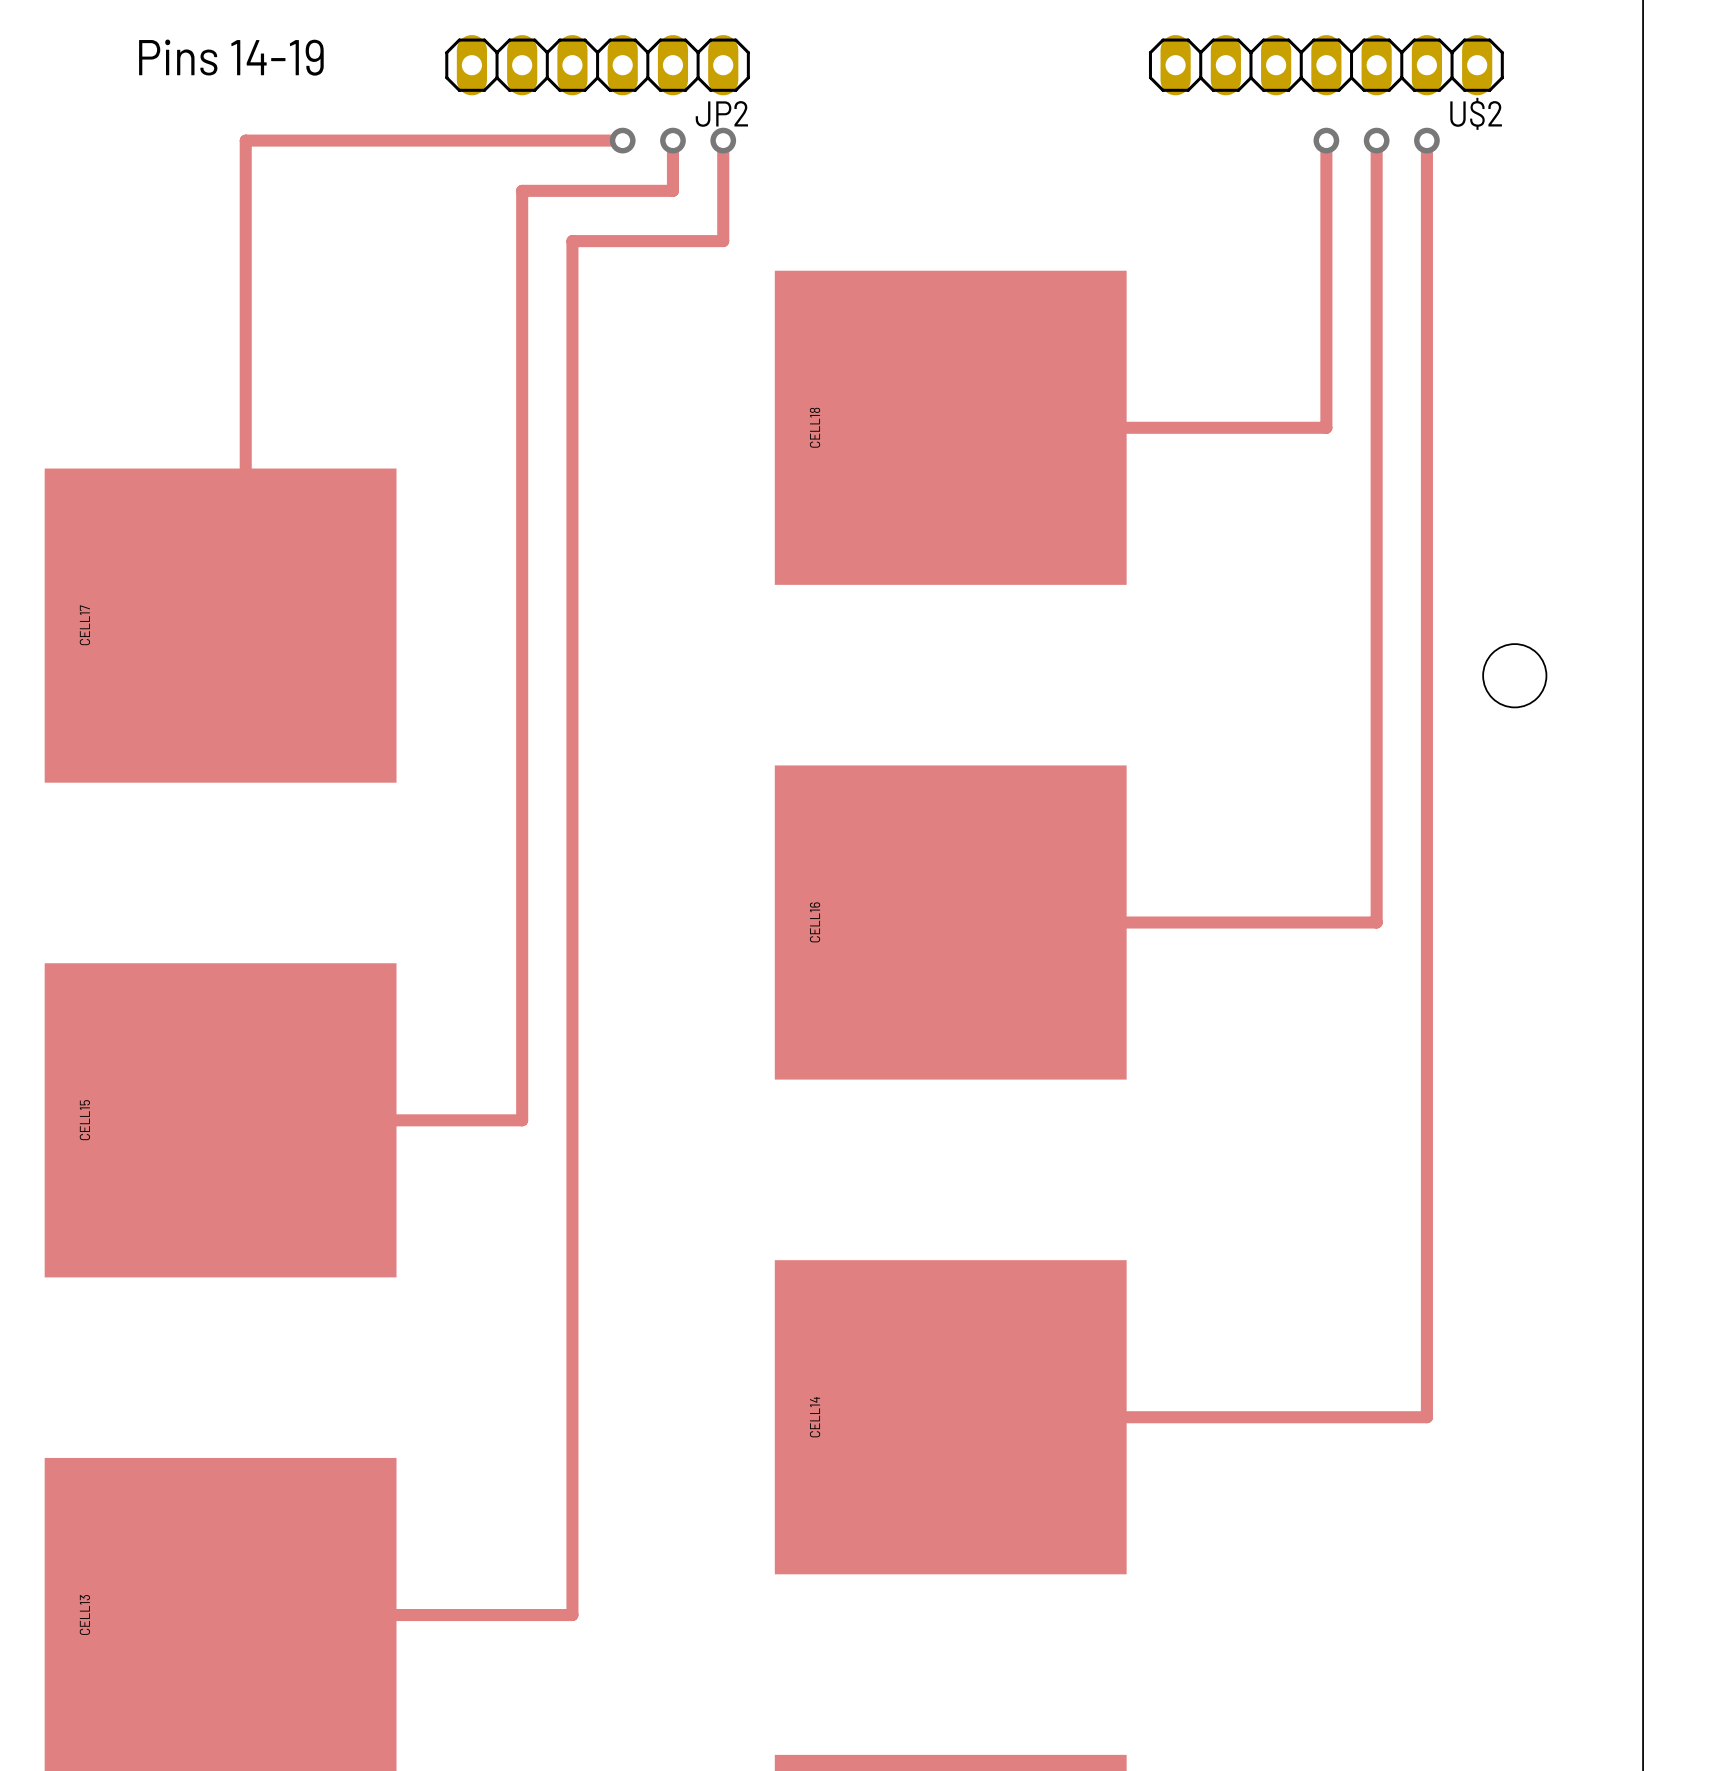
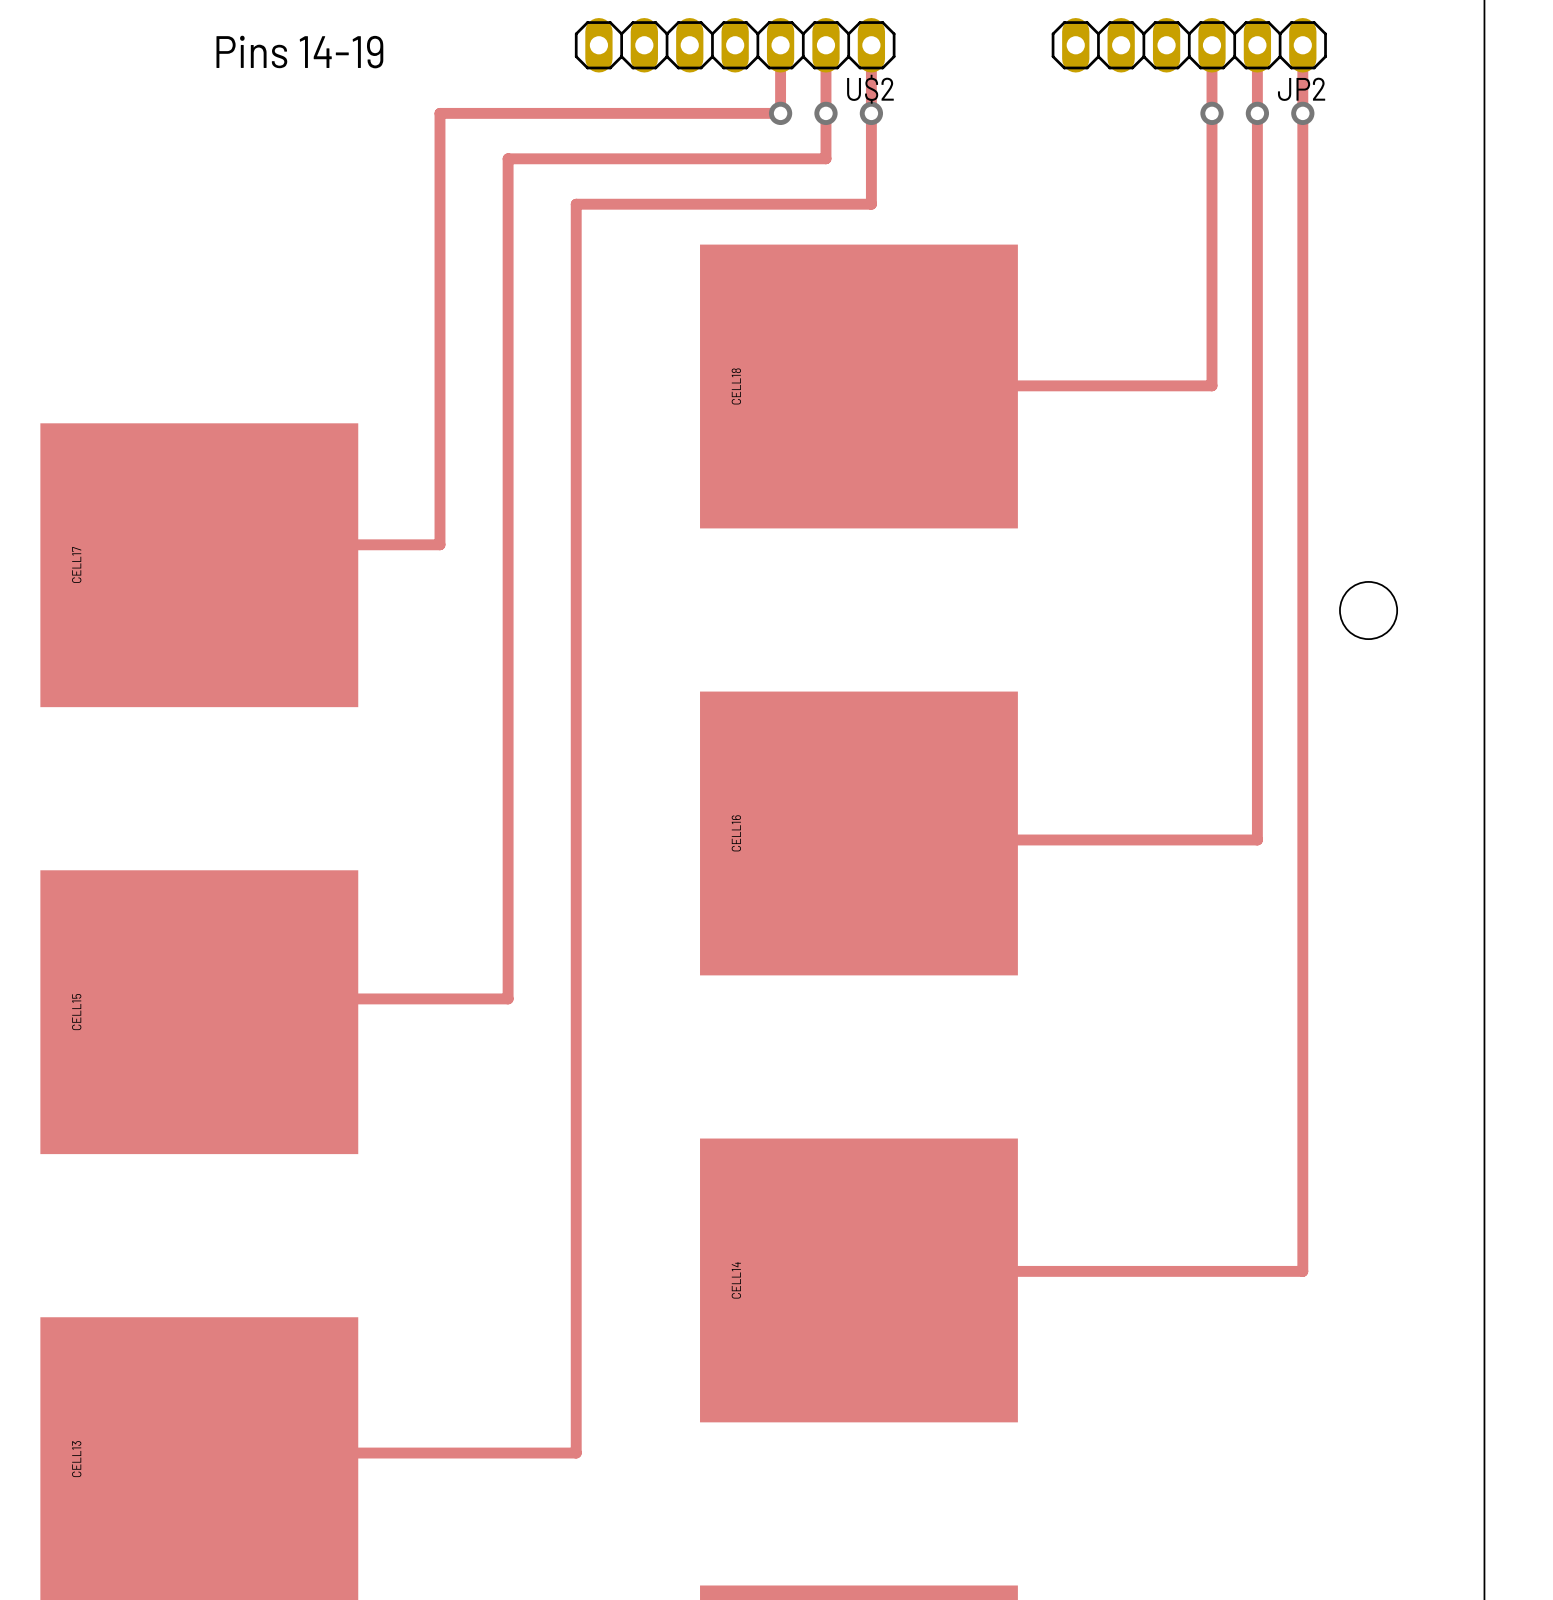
text position: Pins 14-19 (231, 57) -> Pins 14-19 (299, 52)
JP2 position: (597, 65) -> (1189, 45)
U$2 position: (1326, 65) -> (735, 45)
via: none -> (780, 113)
via: none -> (825, 113)
via: none -> (871, 113)
via: none -> (1211, 113)
via: none -> (1257, 113)
via: none -> (1302, 113)
track: (622, 140) (245, 140) (245, 625) (220, 625) -> (780, 45) (780, 113) (439, 113) (439, 544) (219, 544) (199, 565)
via: (622, 140) -> none
track: (672, 140) (672, 190) (522, 190) (522, 1120) (220, 1120) -> (825, 45) (825, 158) (508, 158) (508, 998) (212, 998) (199, 1012)
via: (672, 140) -> none
track: (723, 140) (723, 241) (572, 241) (572, 1615) (220, 1615) -> (871, 45) (871, 204) (576, 204) (576, 1453) (205, 1453) (199, 1459)
via: (723, 140) -> none
track: (1326, 140) (1326, 427) (950, 427) -> (1211, 45) (1211, 385) (858, 386)
via: (1326, 140) -> none
track: (1376, 140) (1376, 922) (950, 922) -> (1257, 45) (1257, 839) (865, 839) (858, 833)
via: (1376, 140) -> none
track: (1426, 140) (1426, 1417) (950, 1417) -> (1302, 45) (1302, 1271) (868, 1271) (858, 1280)
via: (1426, 140) -> none

